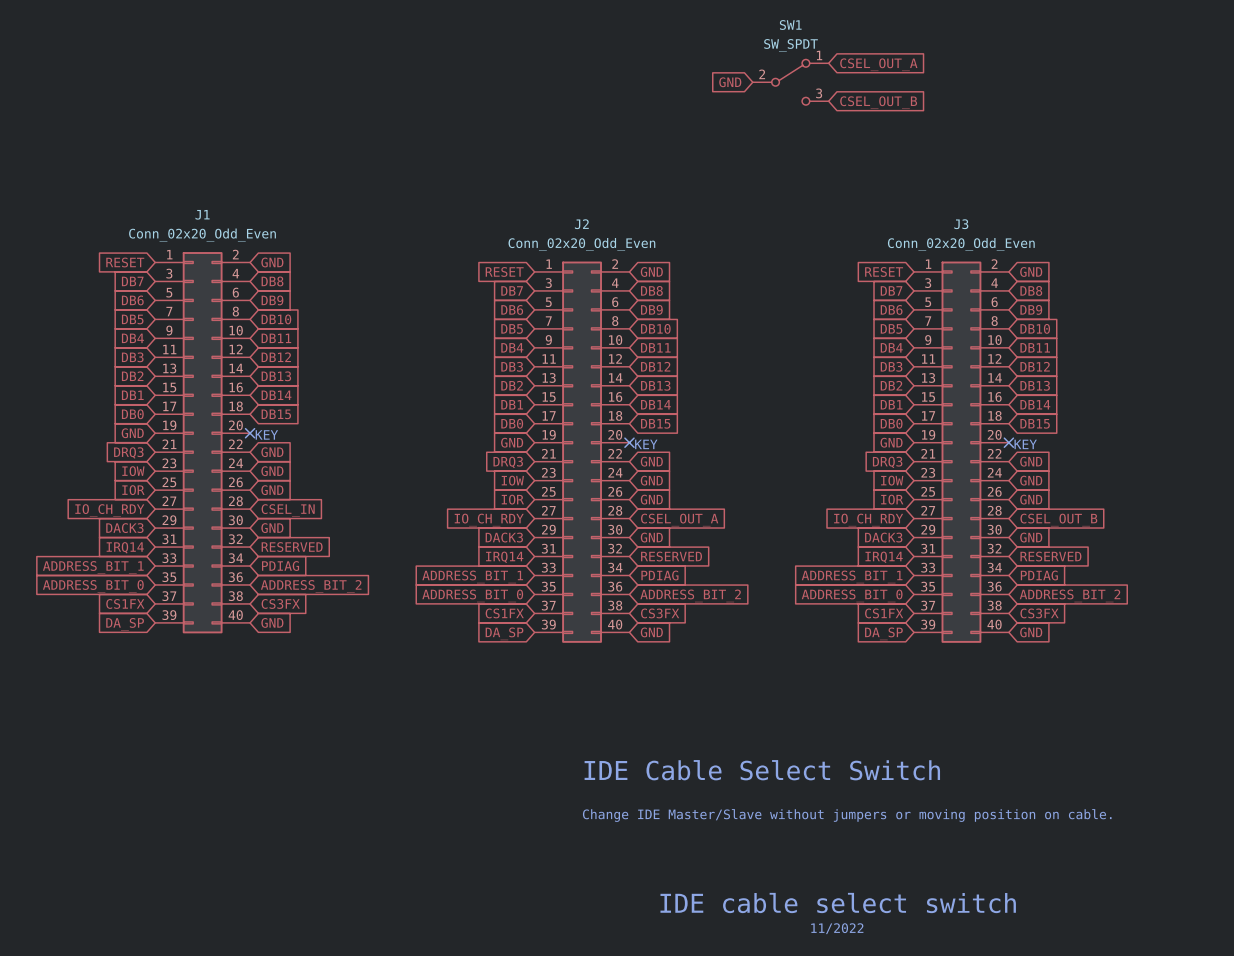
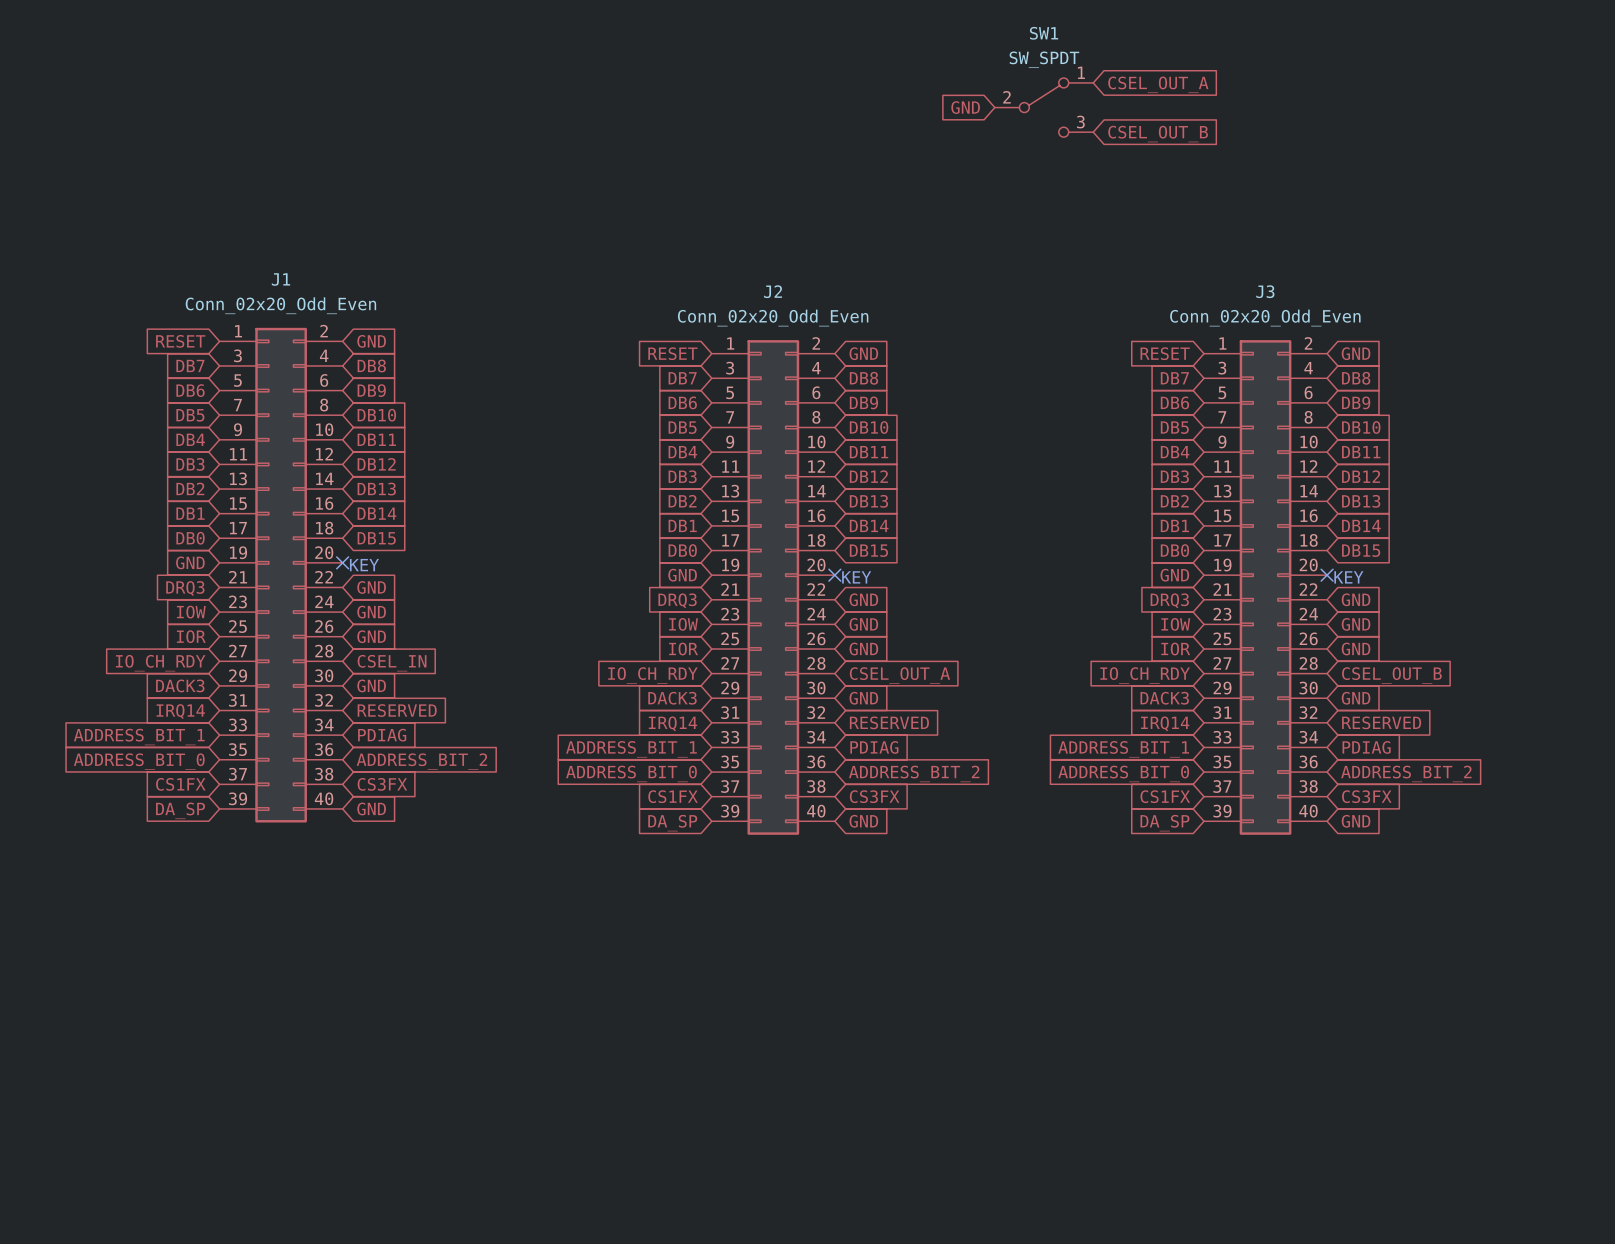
text: IDE Cable Select Switch (762, 770) -> none
text: Change IDE Master/Slave without jumpers or moving position on cable. (847, 815) -> none
text: IDE cable select switch (838, 903) -> none
text: 11/2022 (837, 928) -> none

